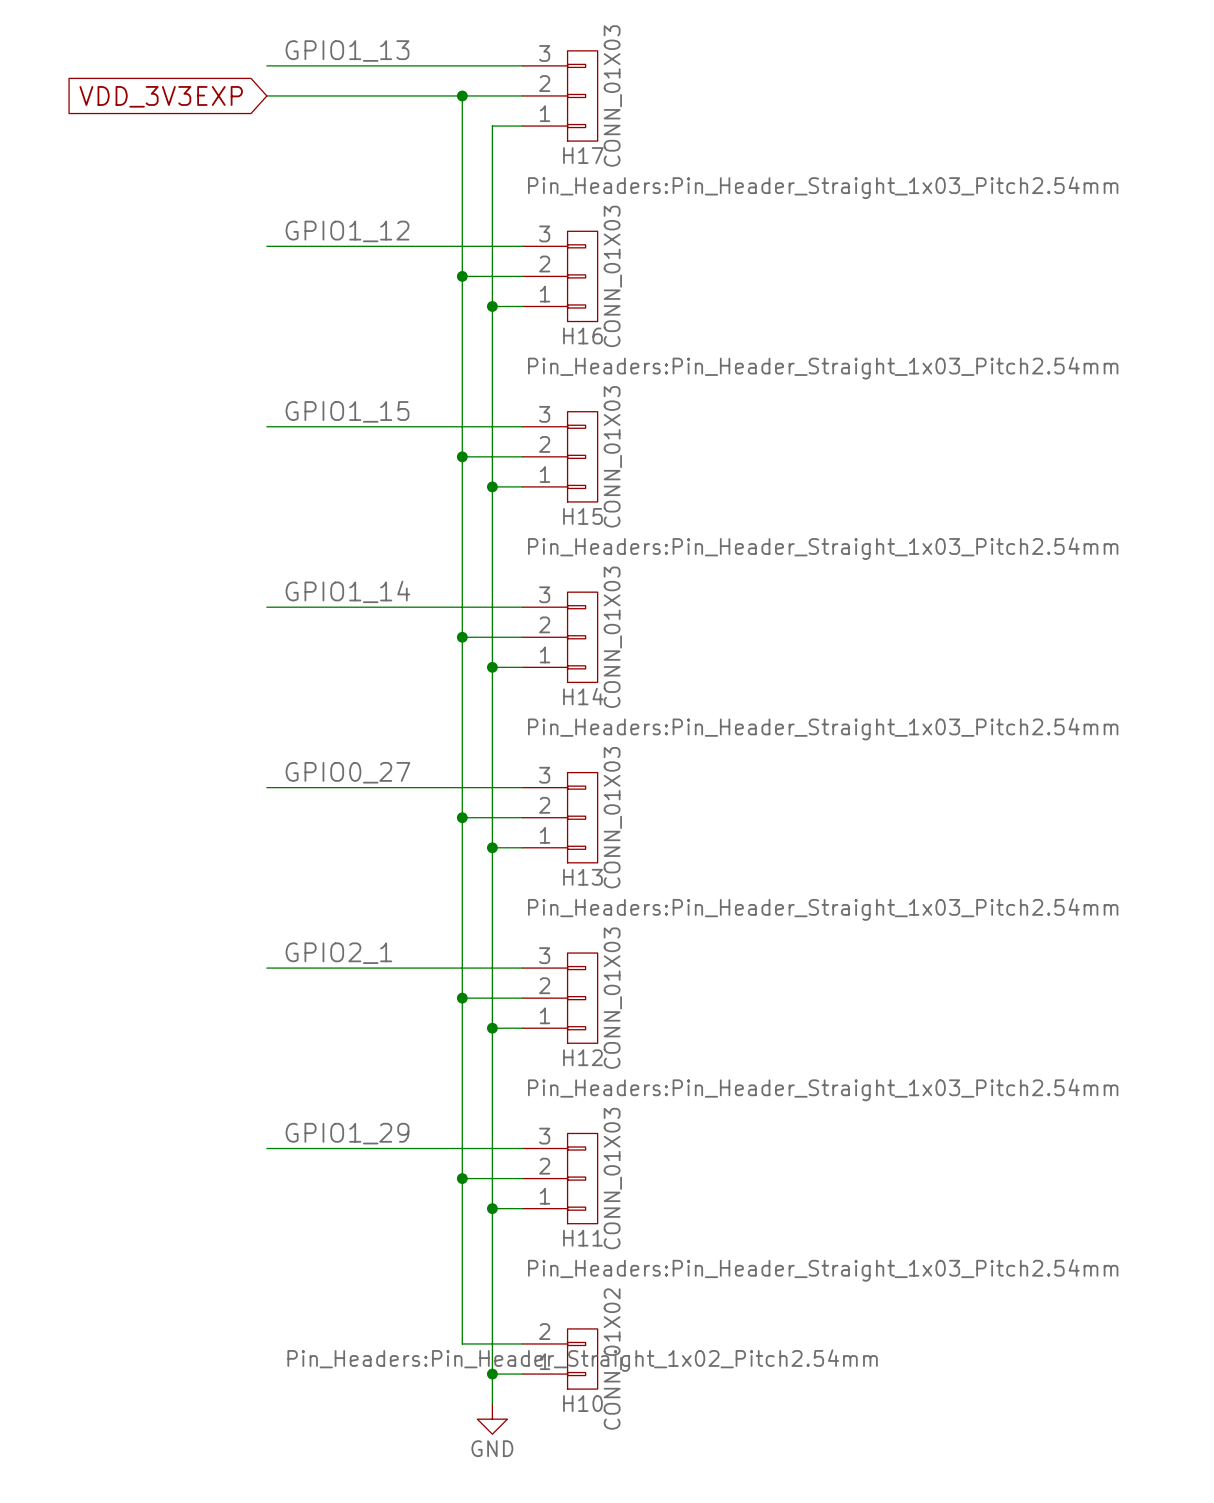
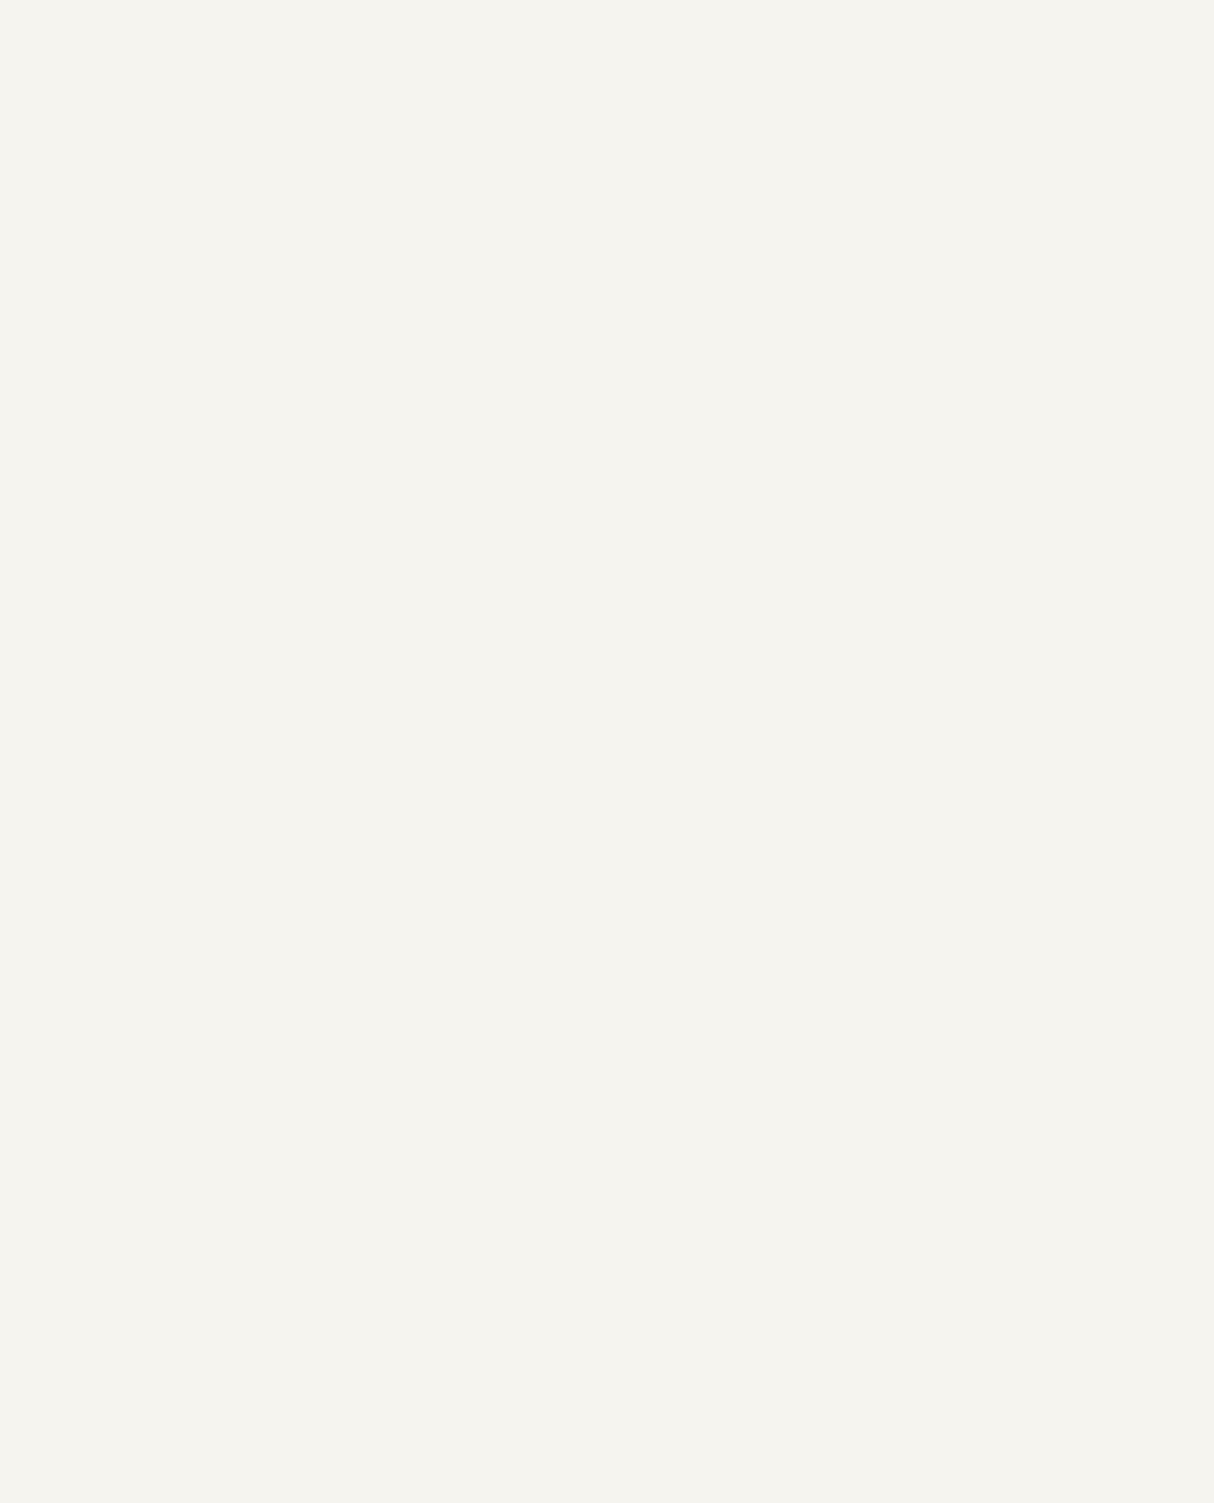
label: GPIO1_13 (347, 51) -> none
wire: (266, 65) (522, 65) -> none
wire: (266, 95) (522, 95) -> none
wire: (462, 95) (462, 1343) (522, 1343) -> none
junction: (462, 95) -> none
H17: CONN_01X03 (560, 95) -> none
global label: VDD_3V3EXP (161, 96) -> none
wire: (522, 126) (492, 126) (492, 1404) -> none
label: GPIO1_12 (347, 231) -> none
wire: (266, 246) (522, 246) -> none
wire: (462, 276) (522, 276) -> none
junction: (462, 276) -> none
H16: CONN_01X03 (560, 276) -> none
wire: (492, 306) (522, 306) -> none
junction: (492, 306) -> none
label: GPIO1_15 (347, 411) -> none
wire: (266, 426) (522, 426) -> none
wire: (462, 456) (522, 456) -> none
junction: (462, 456) -> none
H15: CONN_01X03 (560, 456) -> none
wire: (492, 486) (522, 486) -> none
junction: (492, 486) -> none
label: GPIO1_14 (347, 591) -> none
wire: (266, 607) (522, 607) -> none
wire: (462, 637) (522, 637) -> none
junction: (462, 637) -> none
H14: CONN_01X03 (560, 637) -> none
wire: (492, 667) (522, 667) -> none
junction: (492, 667) -> none
label: GPIO0_27 (347, 772) -> none
wire: (266, 787) (522, 787) -> none
wire: (462, 817) (522, 817) -> none
junction: (462, 817) -> none
H13: CONN_01X03 (560, 817) -> none
wire: (492, 847) (522, 847) -> none
junction: (492, 847) -> none
label: GPIO2_1 (338, 953) -> none
wire: (266, 968) (522, 968) -> none
wire: (462, 998) (522, 998) -> none
junction: (462, 998) -> none
H12: CONN_01X03 (560, 998) -> none
wire: (492, 1028) (522, 1028) -> none
junction: (492, 1028) -> none
label: GPIO1_29 (347, 1133) -> none
wire: (266, 1148) (522, 1148) -> none
wire: (462, 1178) (522, 1178) -> none
junction: (462, 1178) -> none
H11: CONN_01X03 (560, 1178) -> none
wire: (492, 1208) (522, 1208) -> none
junction: (492, 1208) -> none
H10: CONN_01X02 (560, 1359) -> none
wire: (492, 1374) (522, 1374) -> none
junction: (492, 1374) -> none
power symbol: GND (492, 1419) -> none

